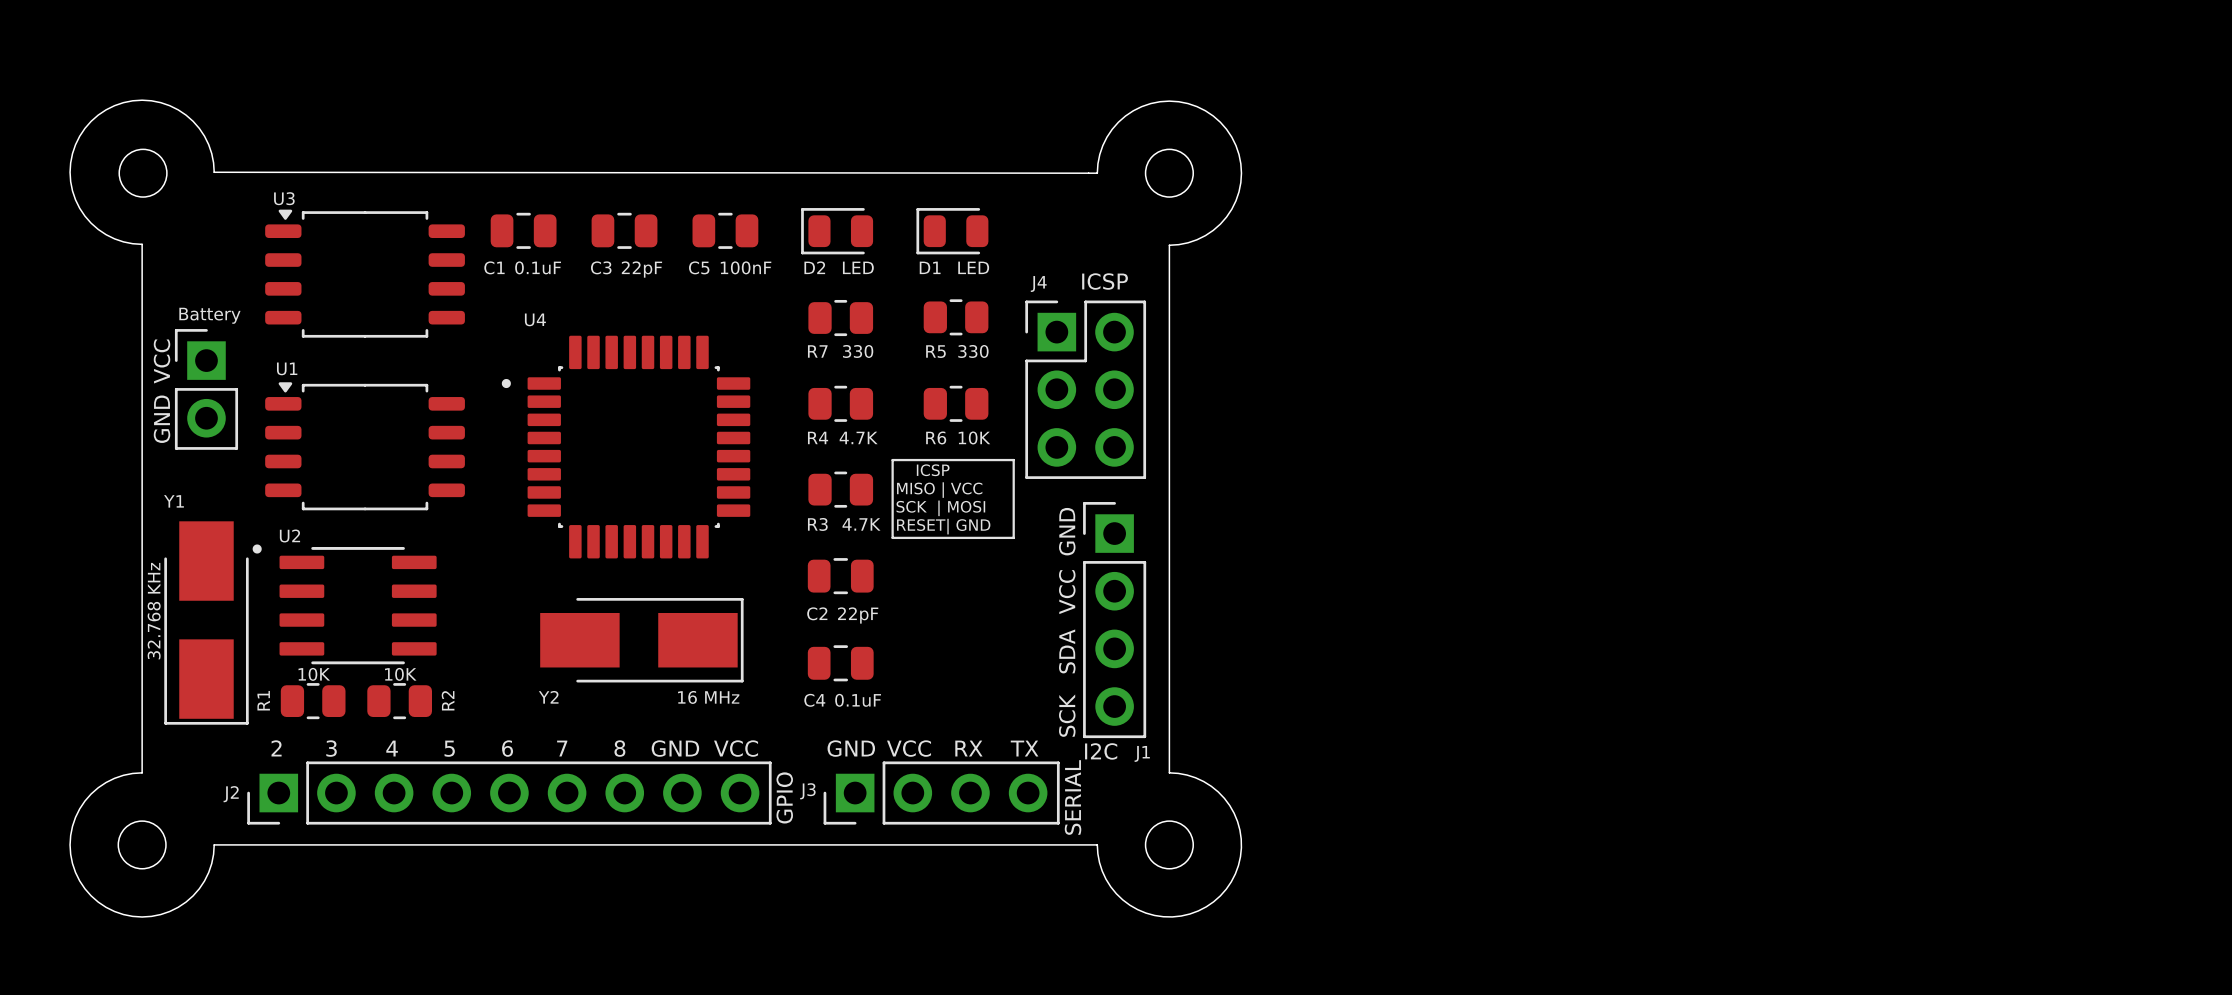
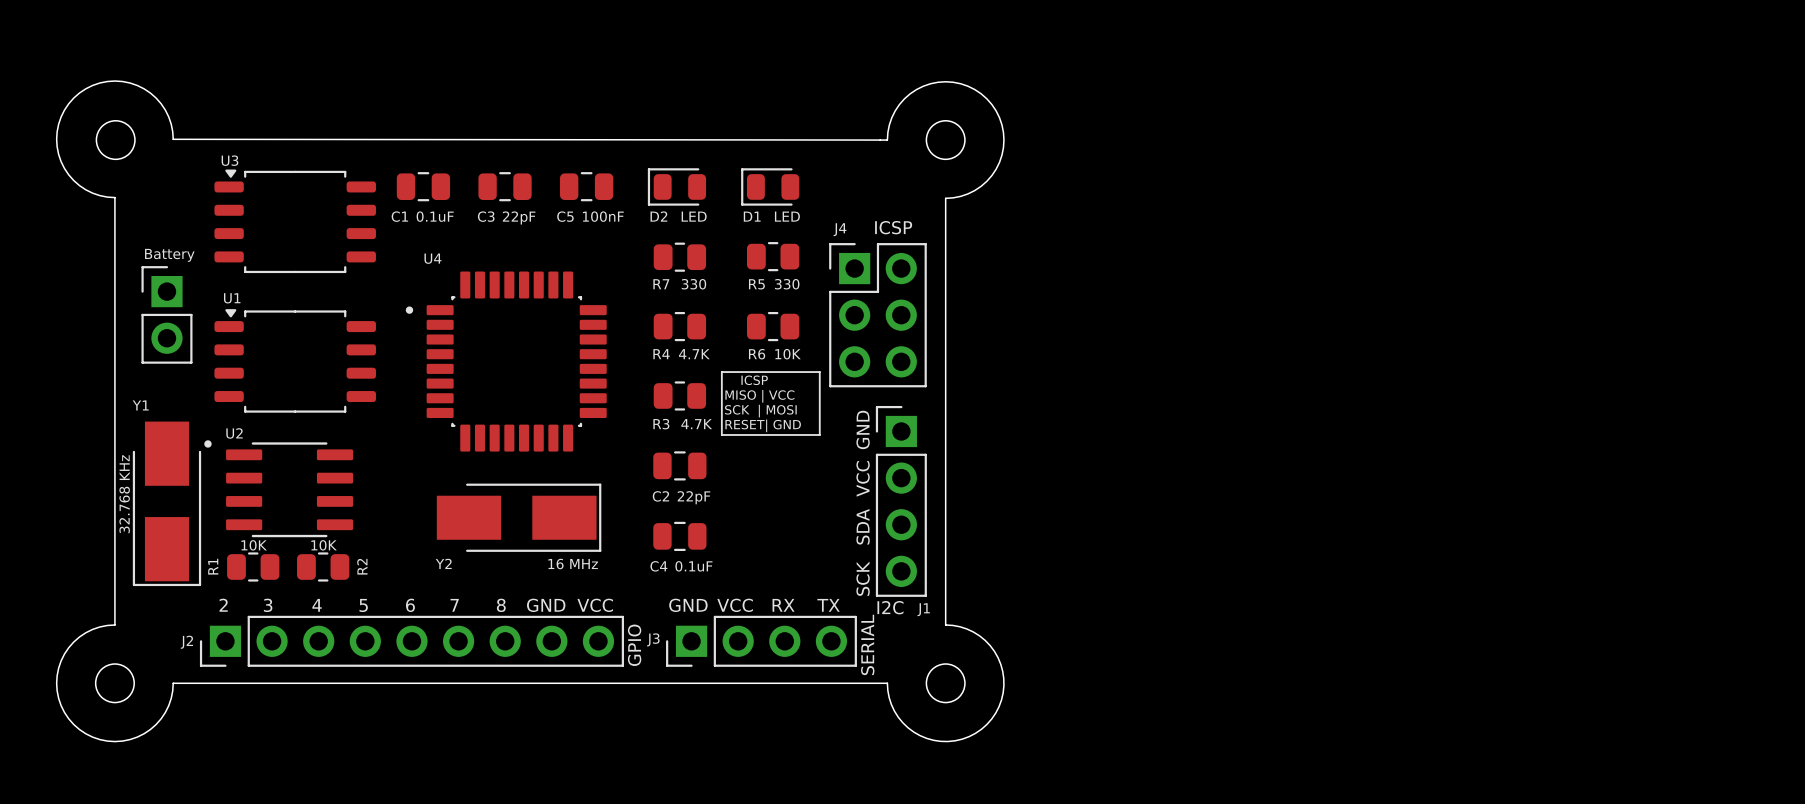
text: VCC (162, 361) -> none
text: GND (162, 419) -> none

